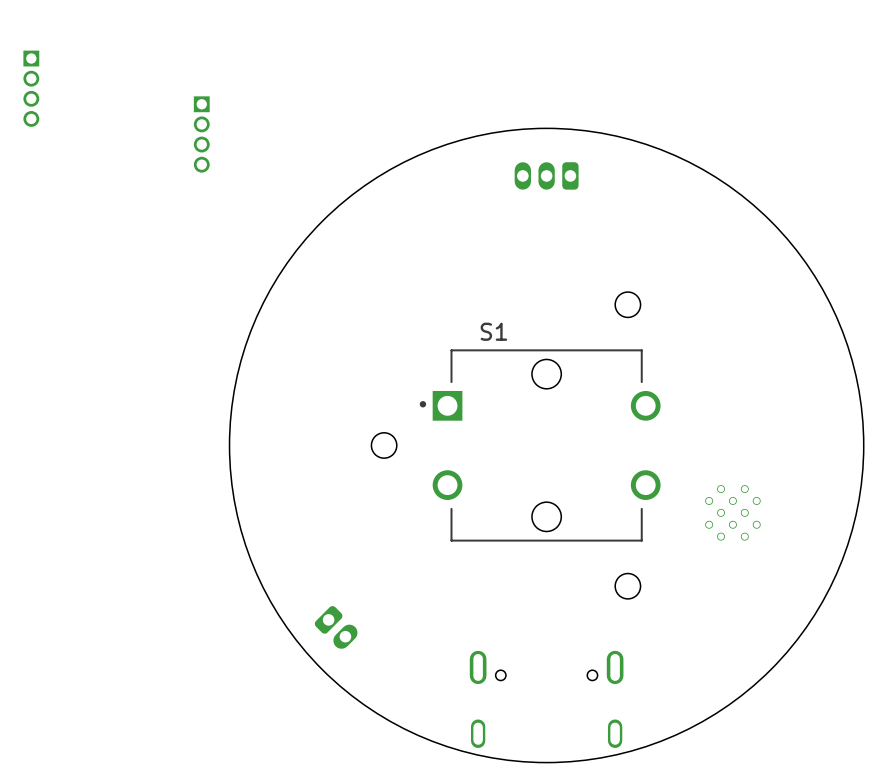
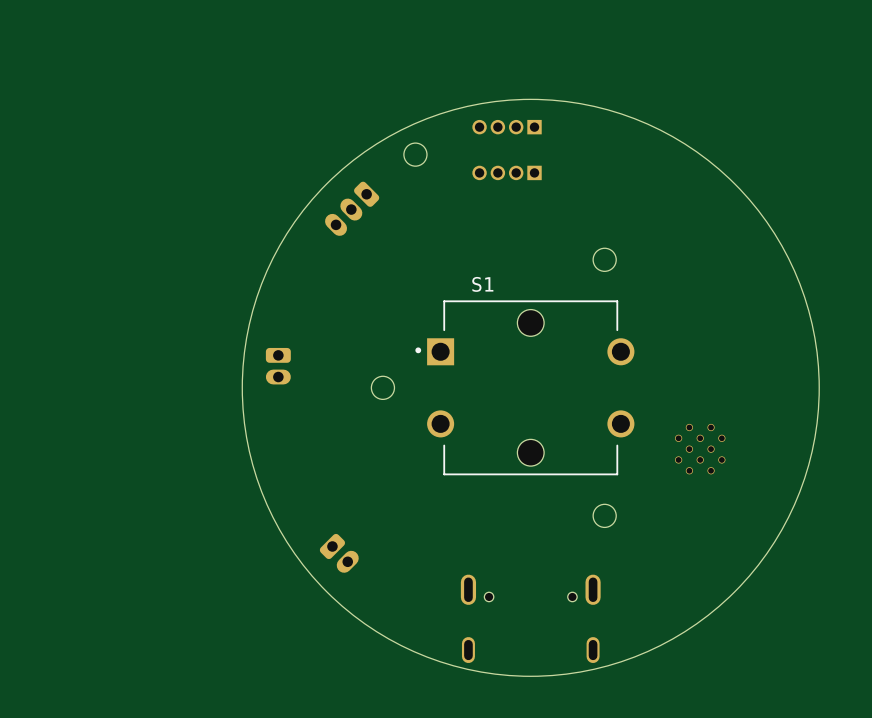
part: (31, 88) -> none
part: (201, 134) -> none
part: none -> (507, 127)
part: (546, 175) -> none
round board edge: none -> [403, 142, 428, 167]
part: none -> (507, 172)
part: none -> (352, 208)
part: none -> (278, 366)

